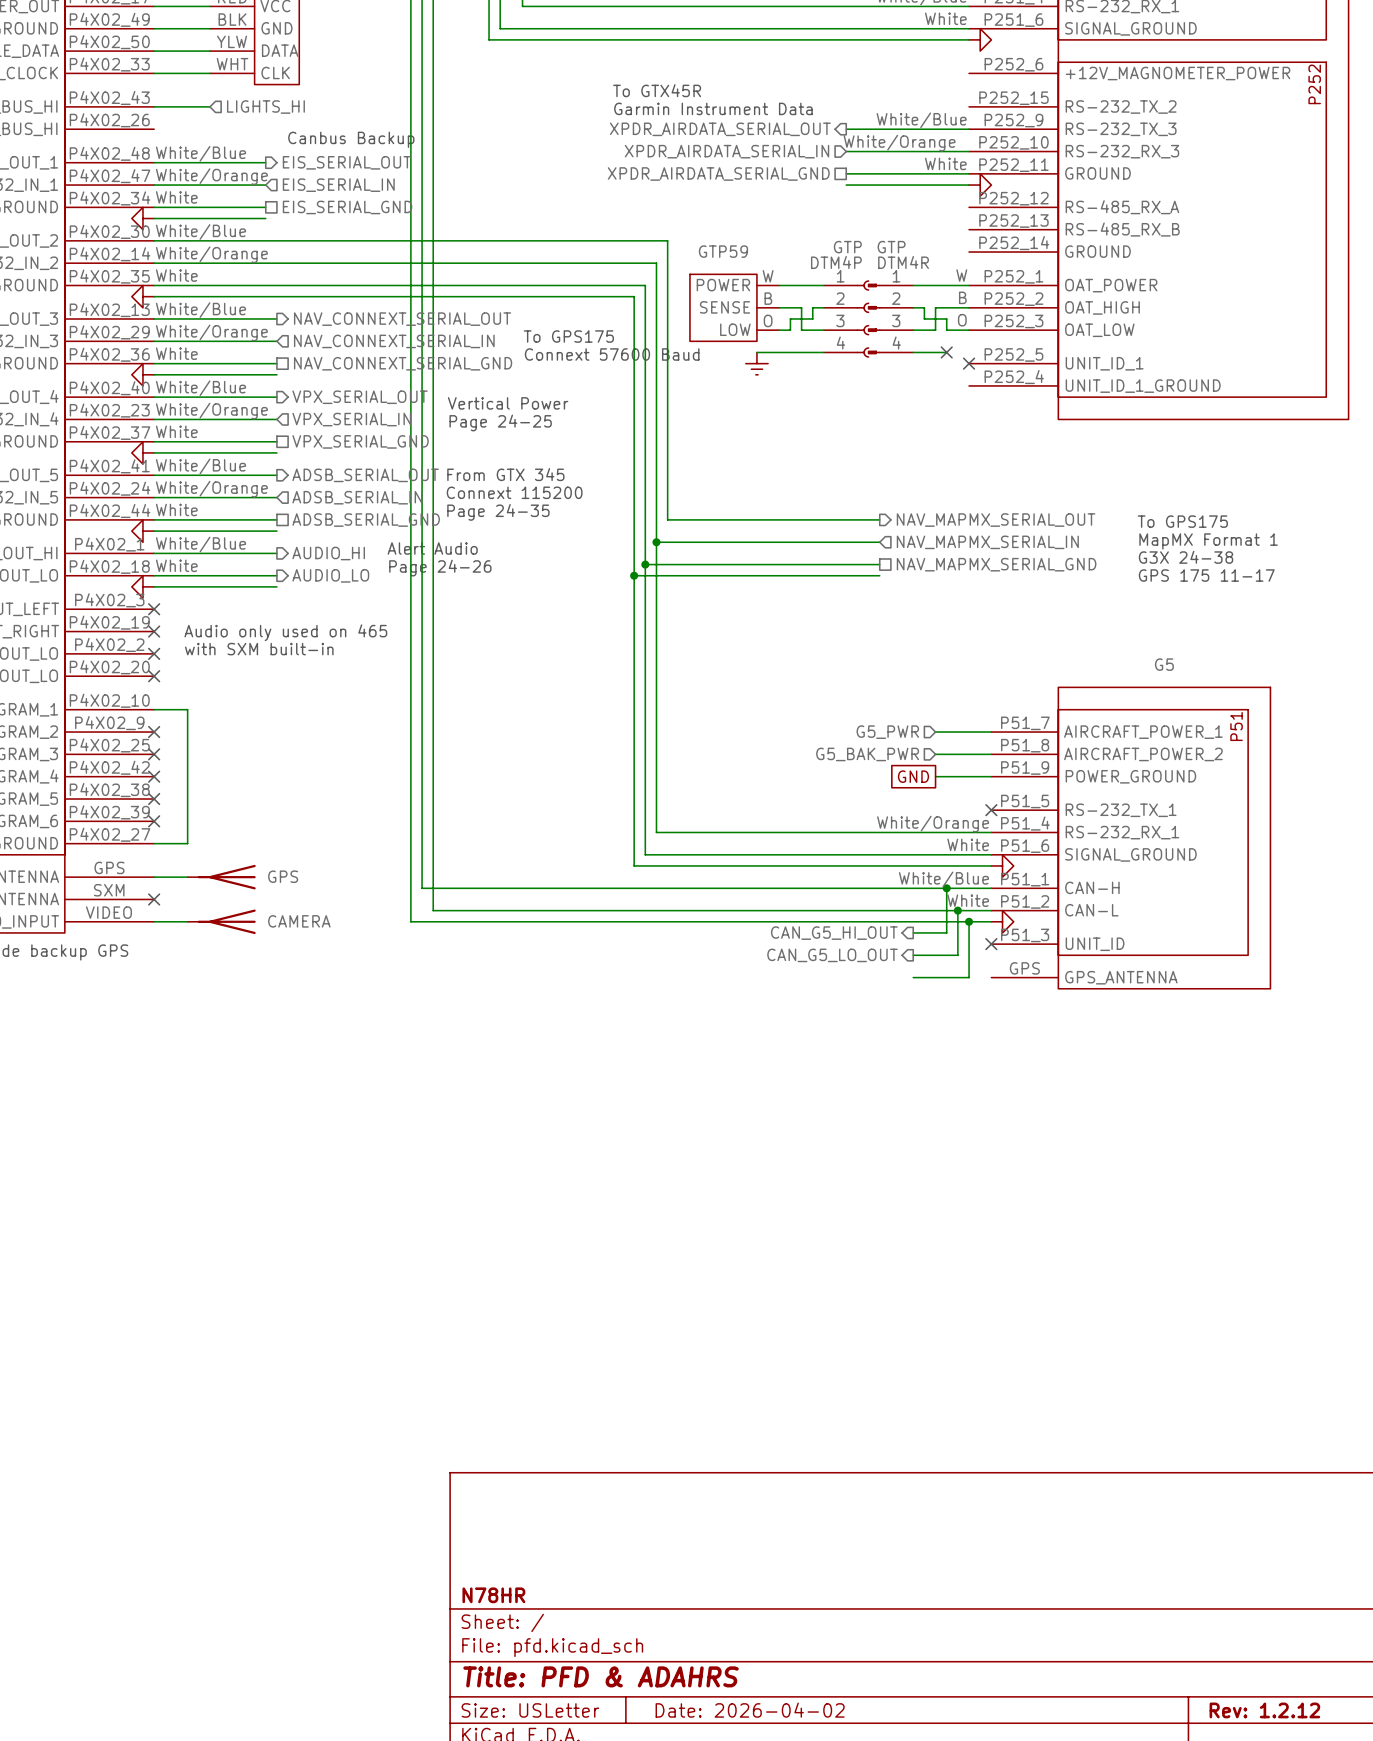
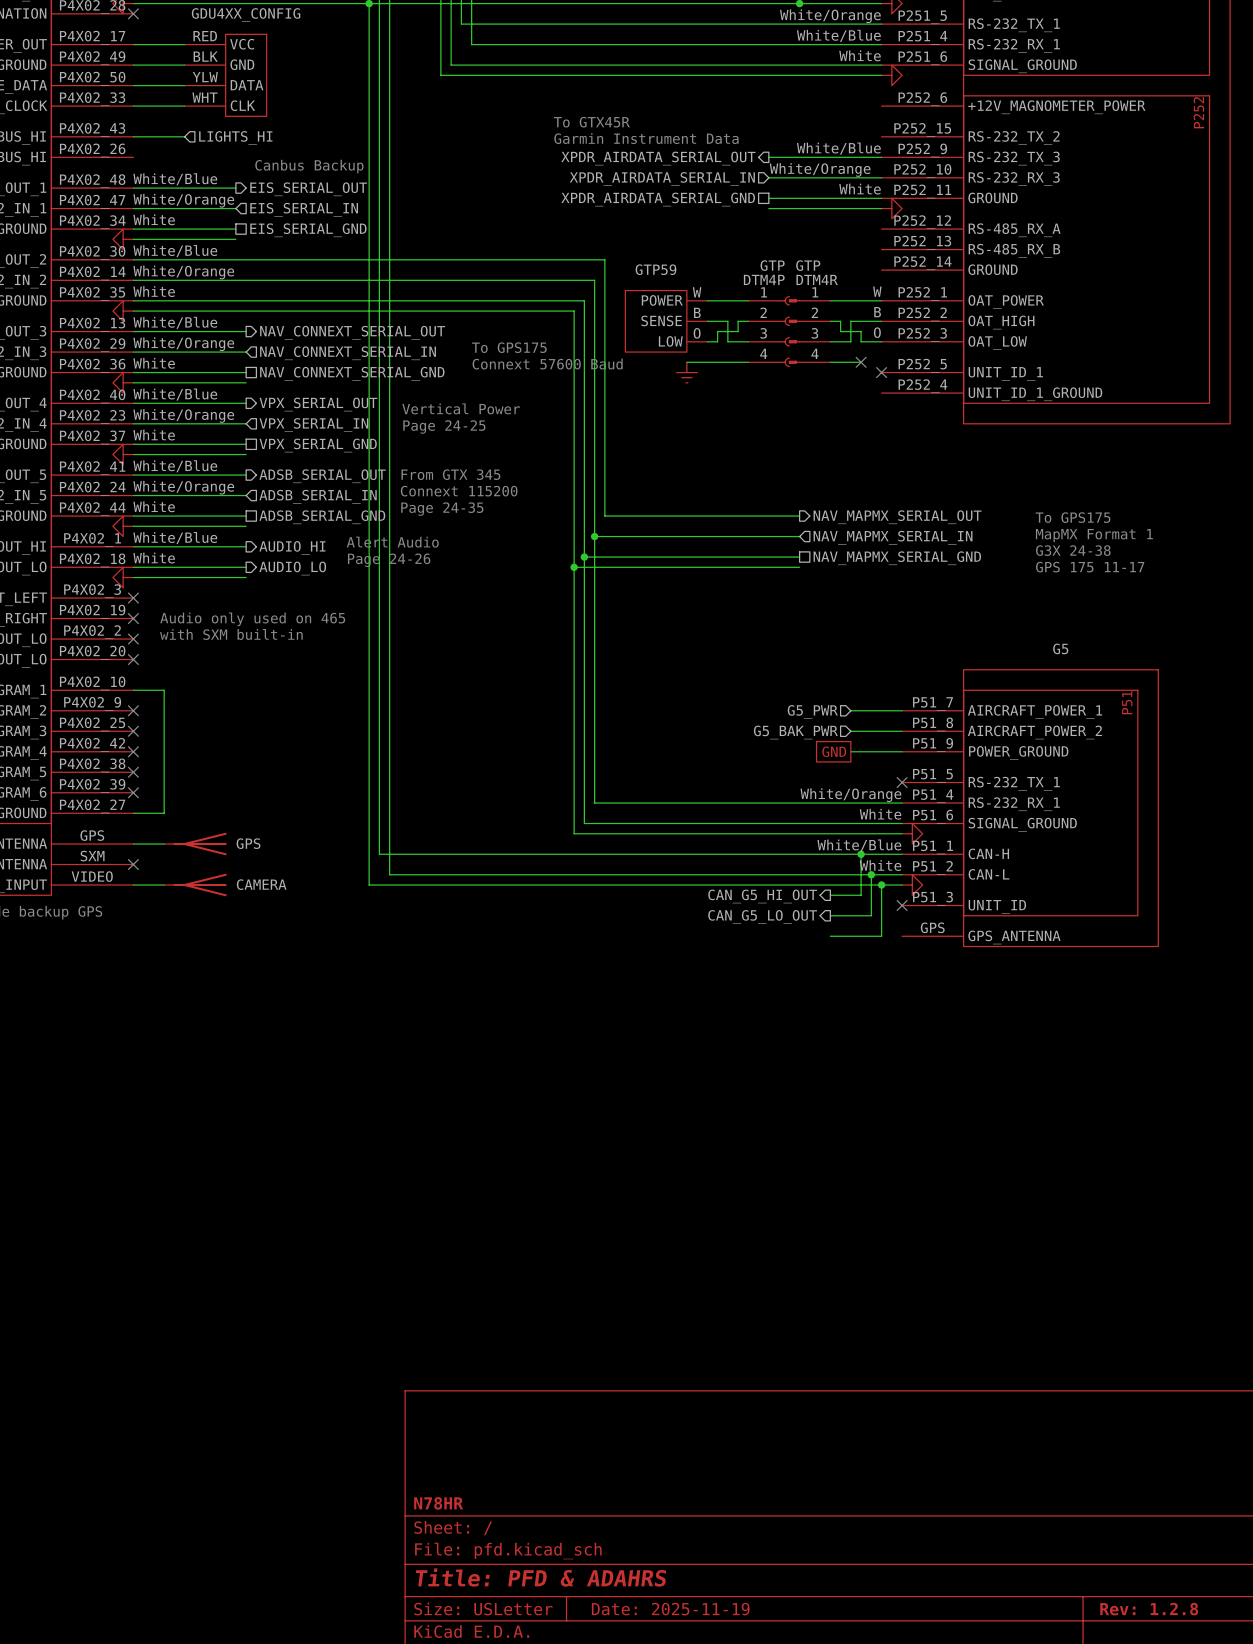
title block: Date: 2026-04-02 (750, 1710) -> Date: 2025-11-19 (670, 1609)
title block: Rev: 1.2.12 (1264, 1710) -> Rev: 1.2.8 (1149, 1609)

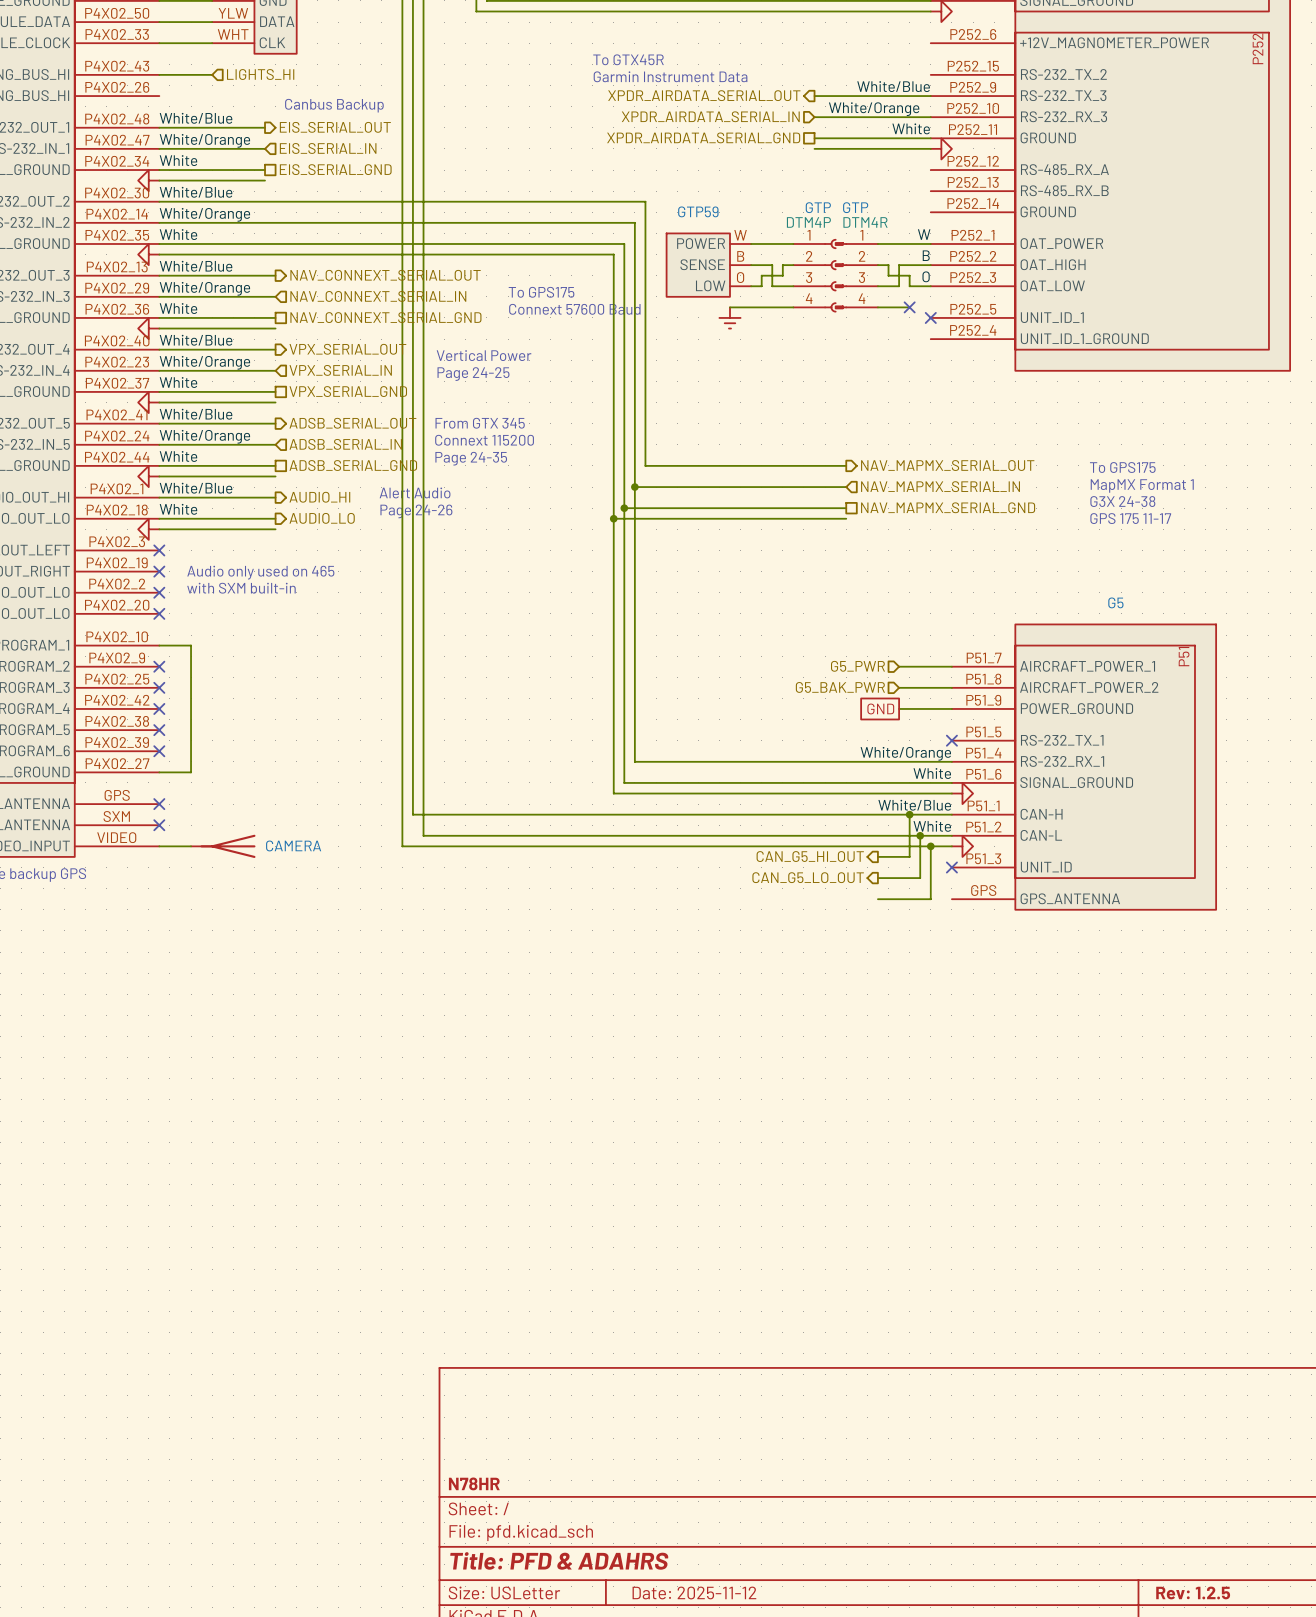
wire: (133, 844) (164, 844) -> none
no-connect mark: none -> (159, 804)
GPS: (195, 844) -> none
title block: Date: 2025-11-19 (670, 1609) -> Date: 2025-11-12 (694, 1592)
title block: Rev: 1.2.8 (1149, 1609) -> Rev: 1.2.5 (1193, 1592)

